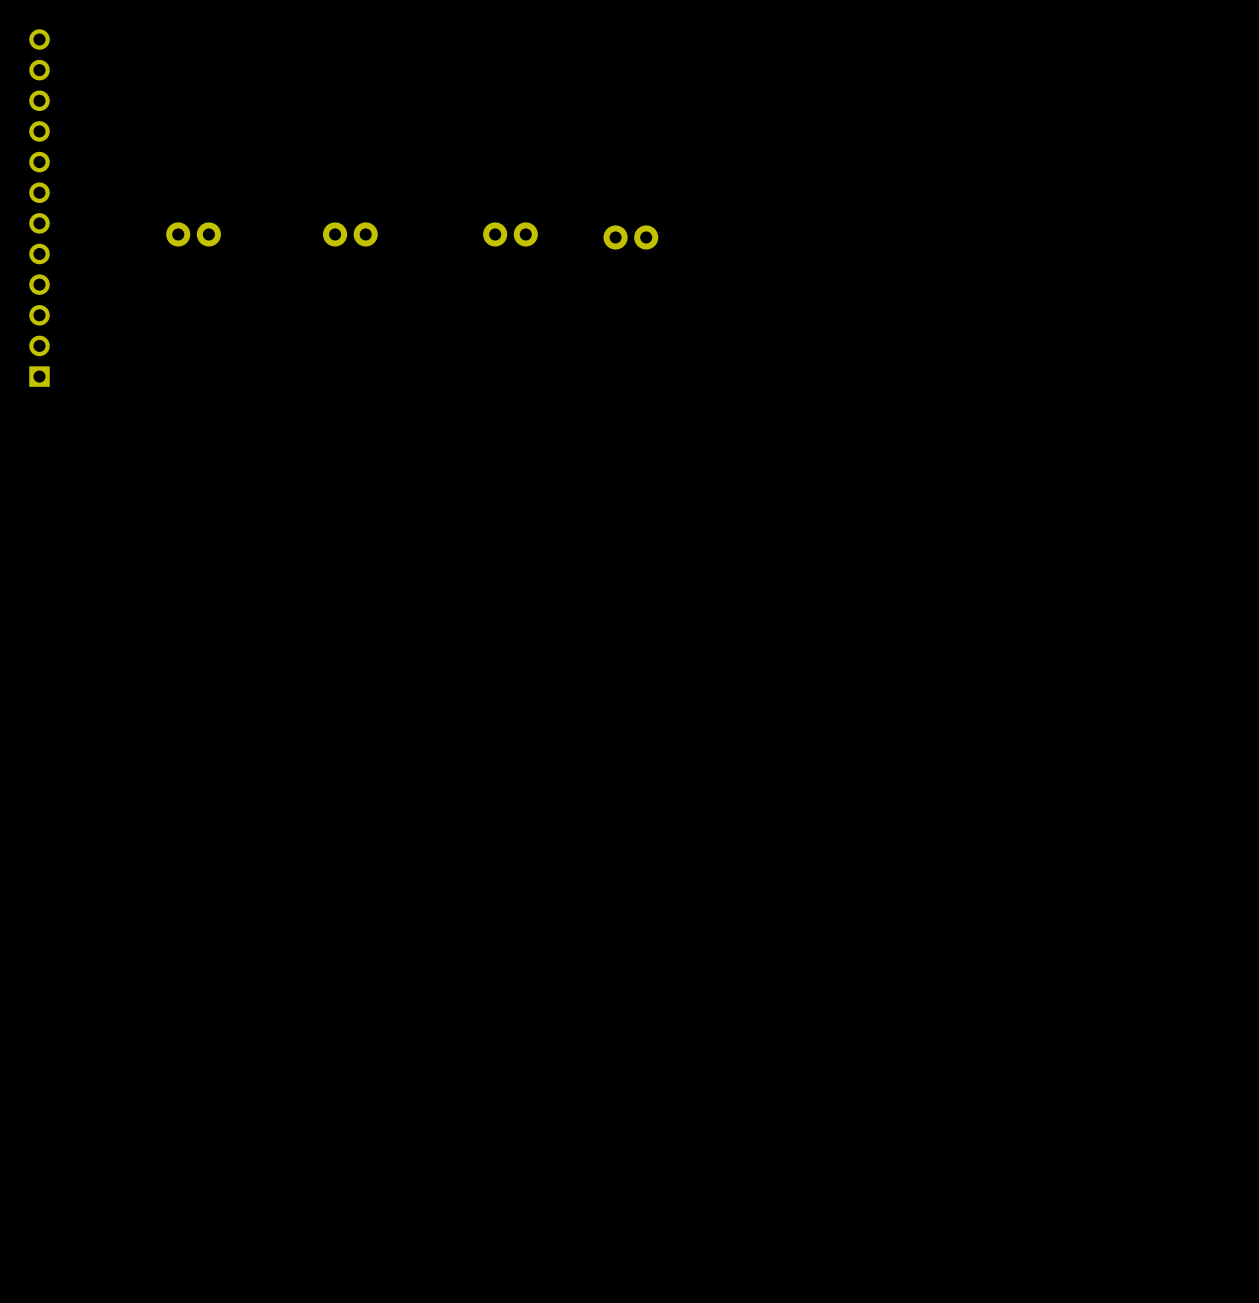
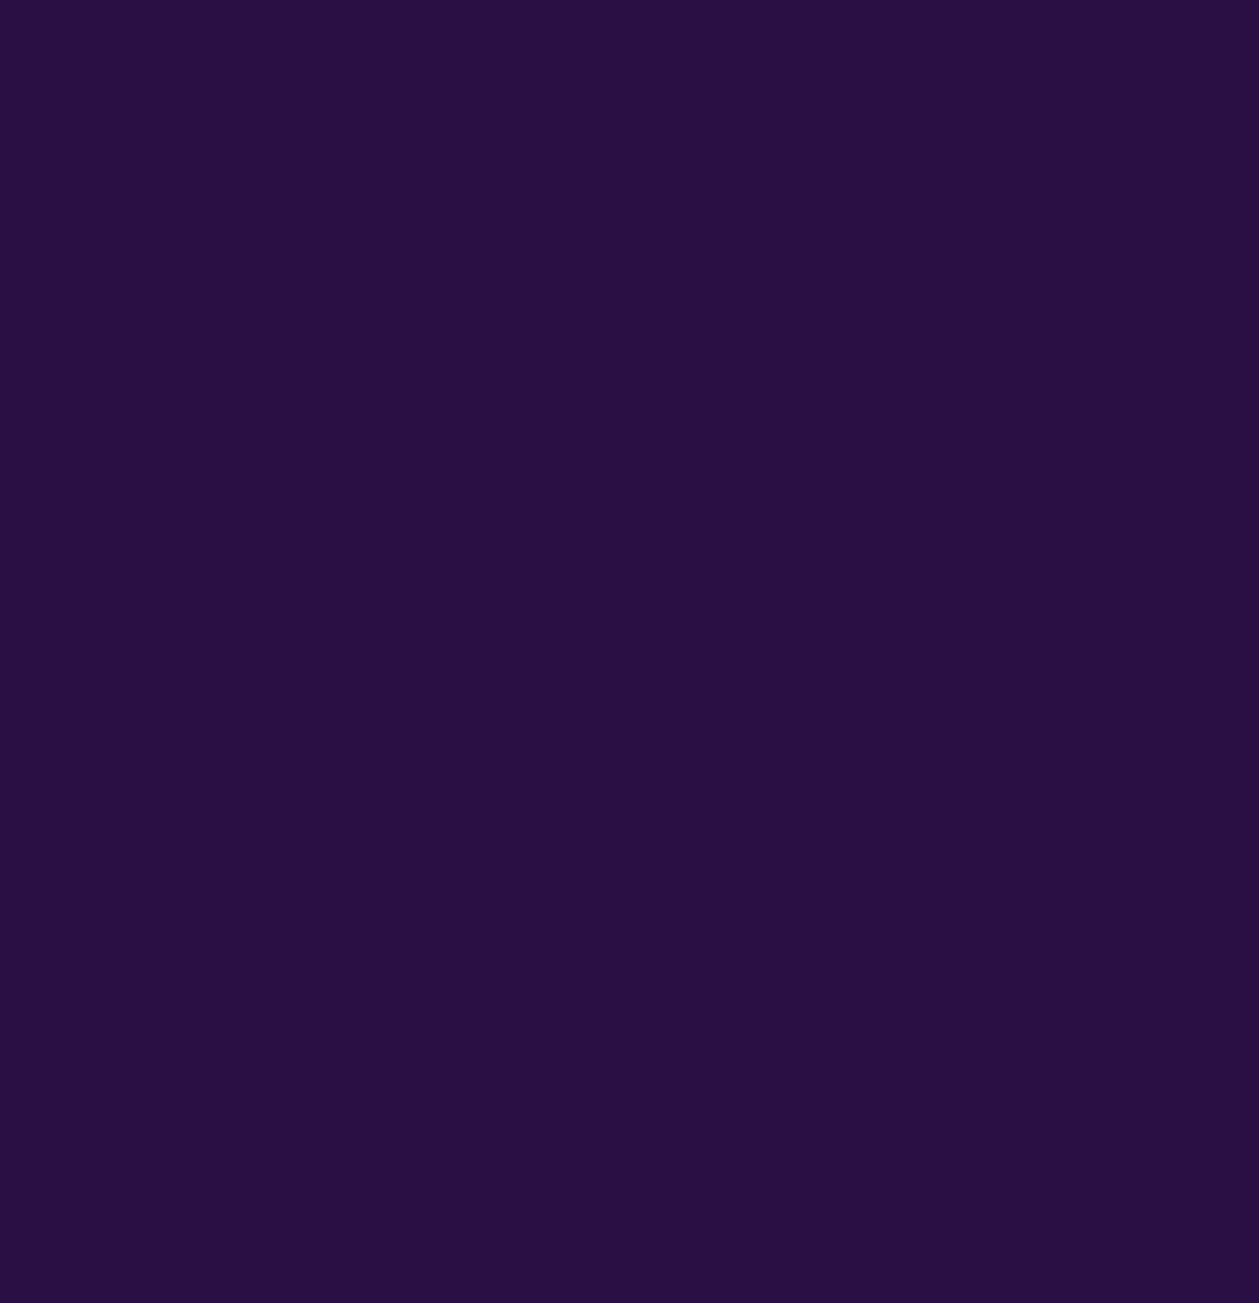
part: (39, 208) -> none
part: (193, 234) -> none
part: (350, 234) -> none
part: (510, 234) -> none
part: (630, 237) -> none

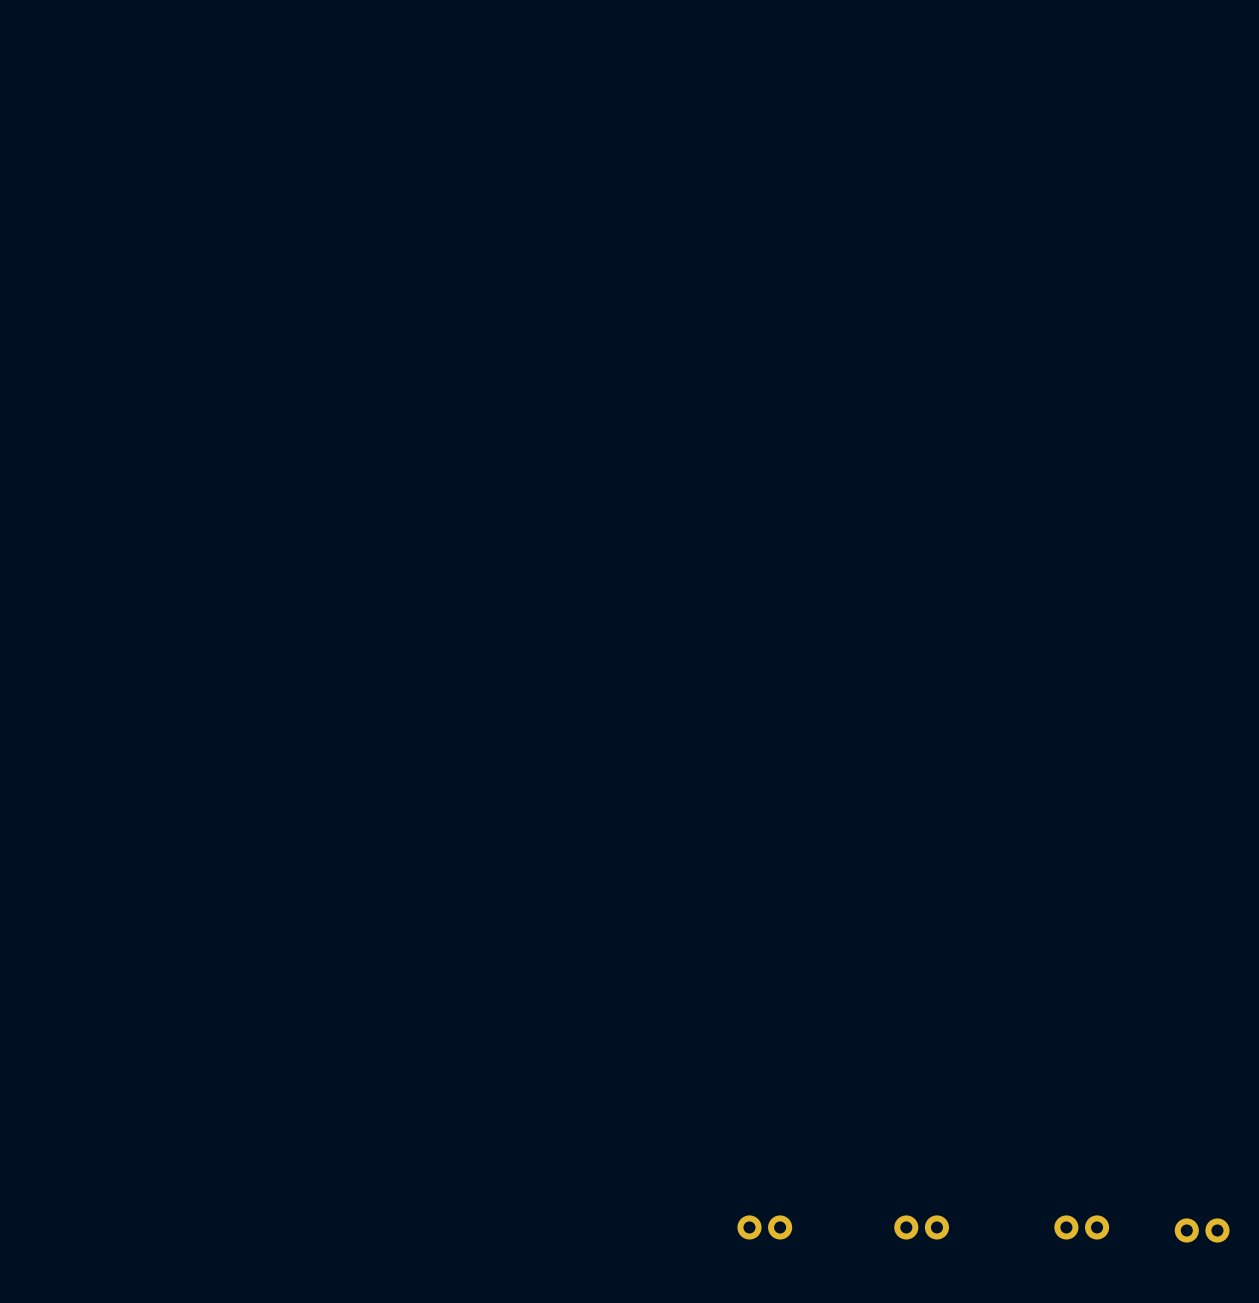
part: none -> (764, 1227)
part: none -> (921, 1227)
part: none -> (1081, 1227)
part: none -> (1202, 1230)

